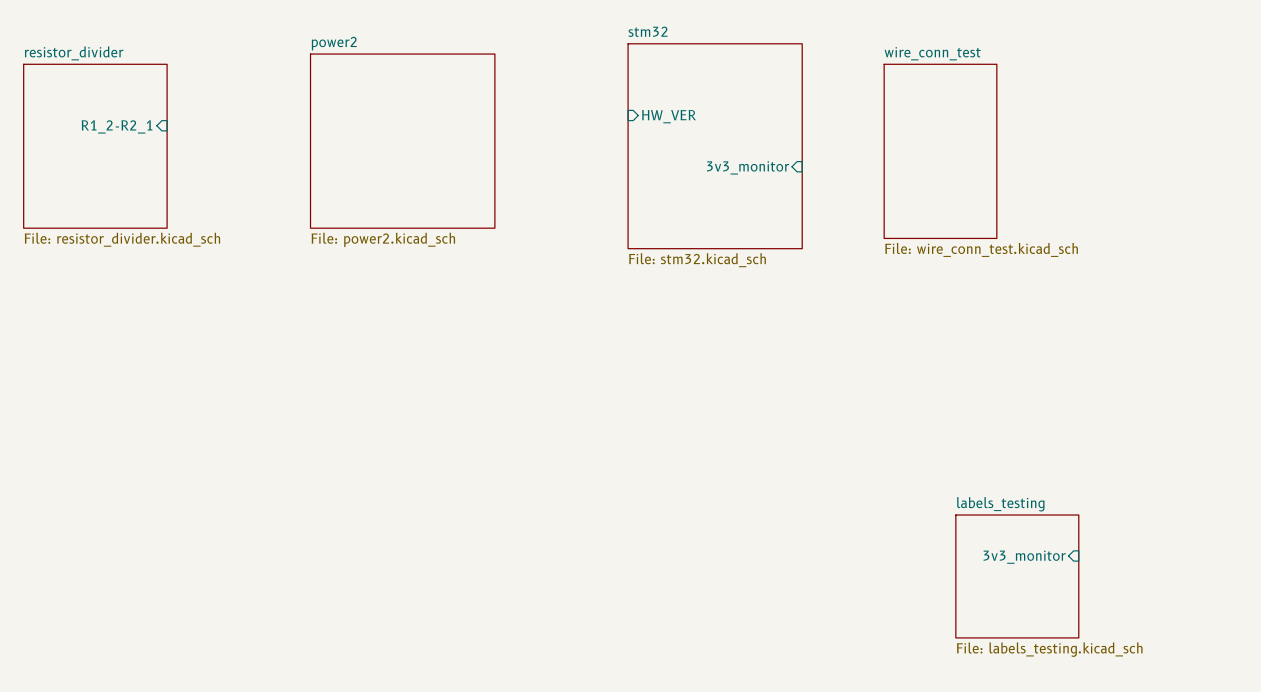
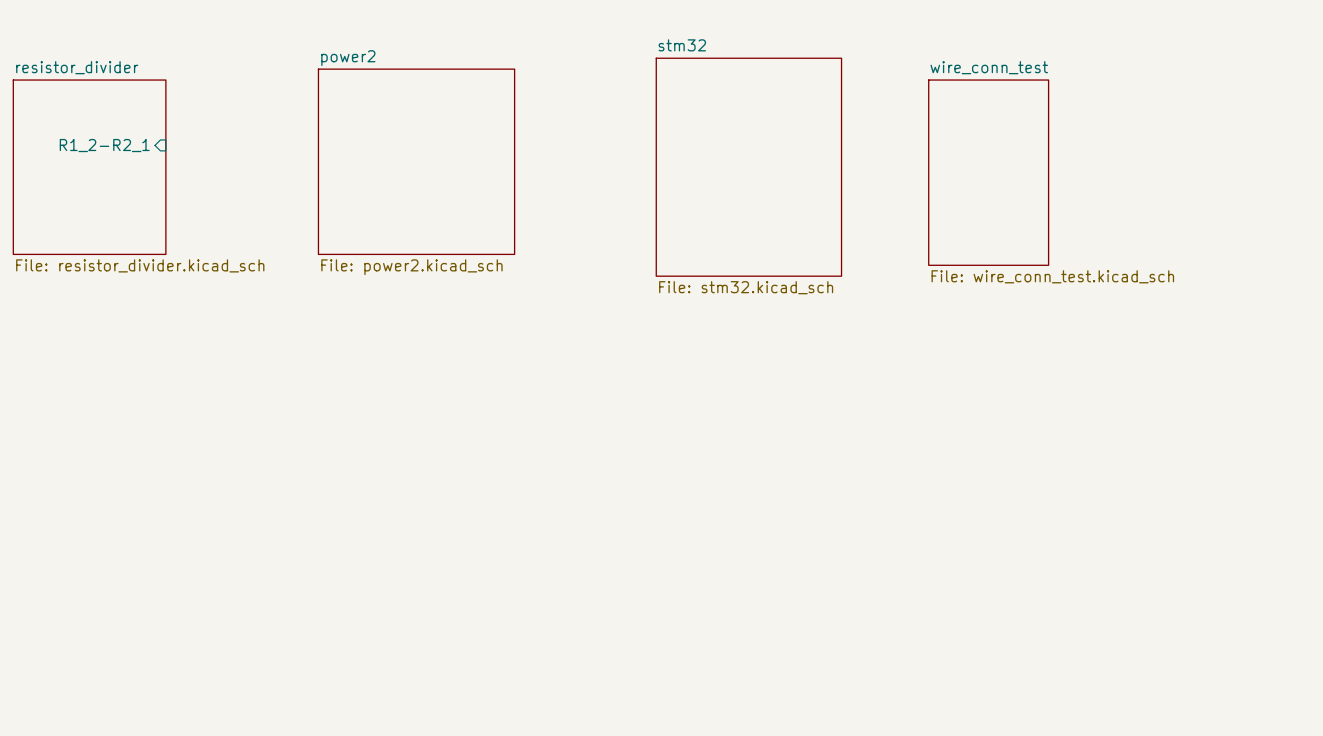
sheet pin: HW_VER (668, 116) -> none
sheet pin: 3v3_monitor (748, 167) -> none
sheet pin: 3v3_monitor (1024, 557) -> none
sheet labels_testing: File: labels_testing.kicad_sch (1017, 576) -> none

